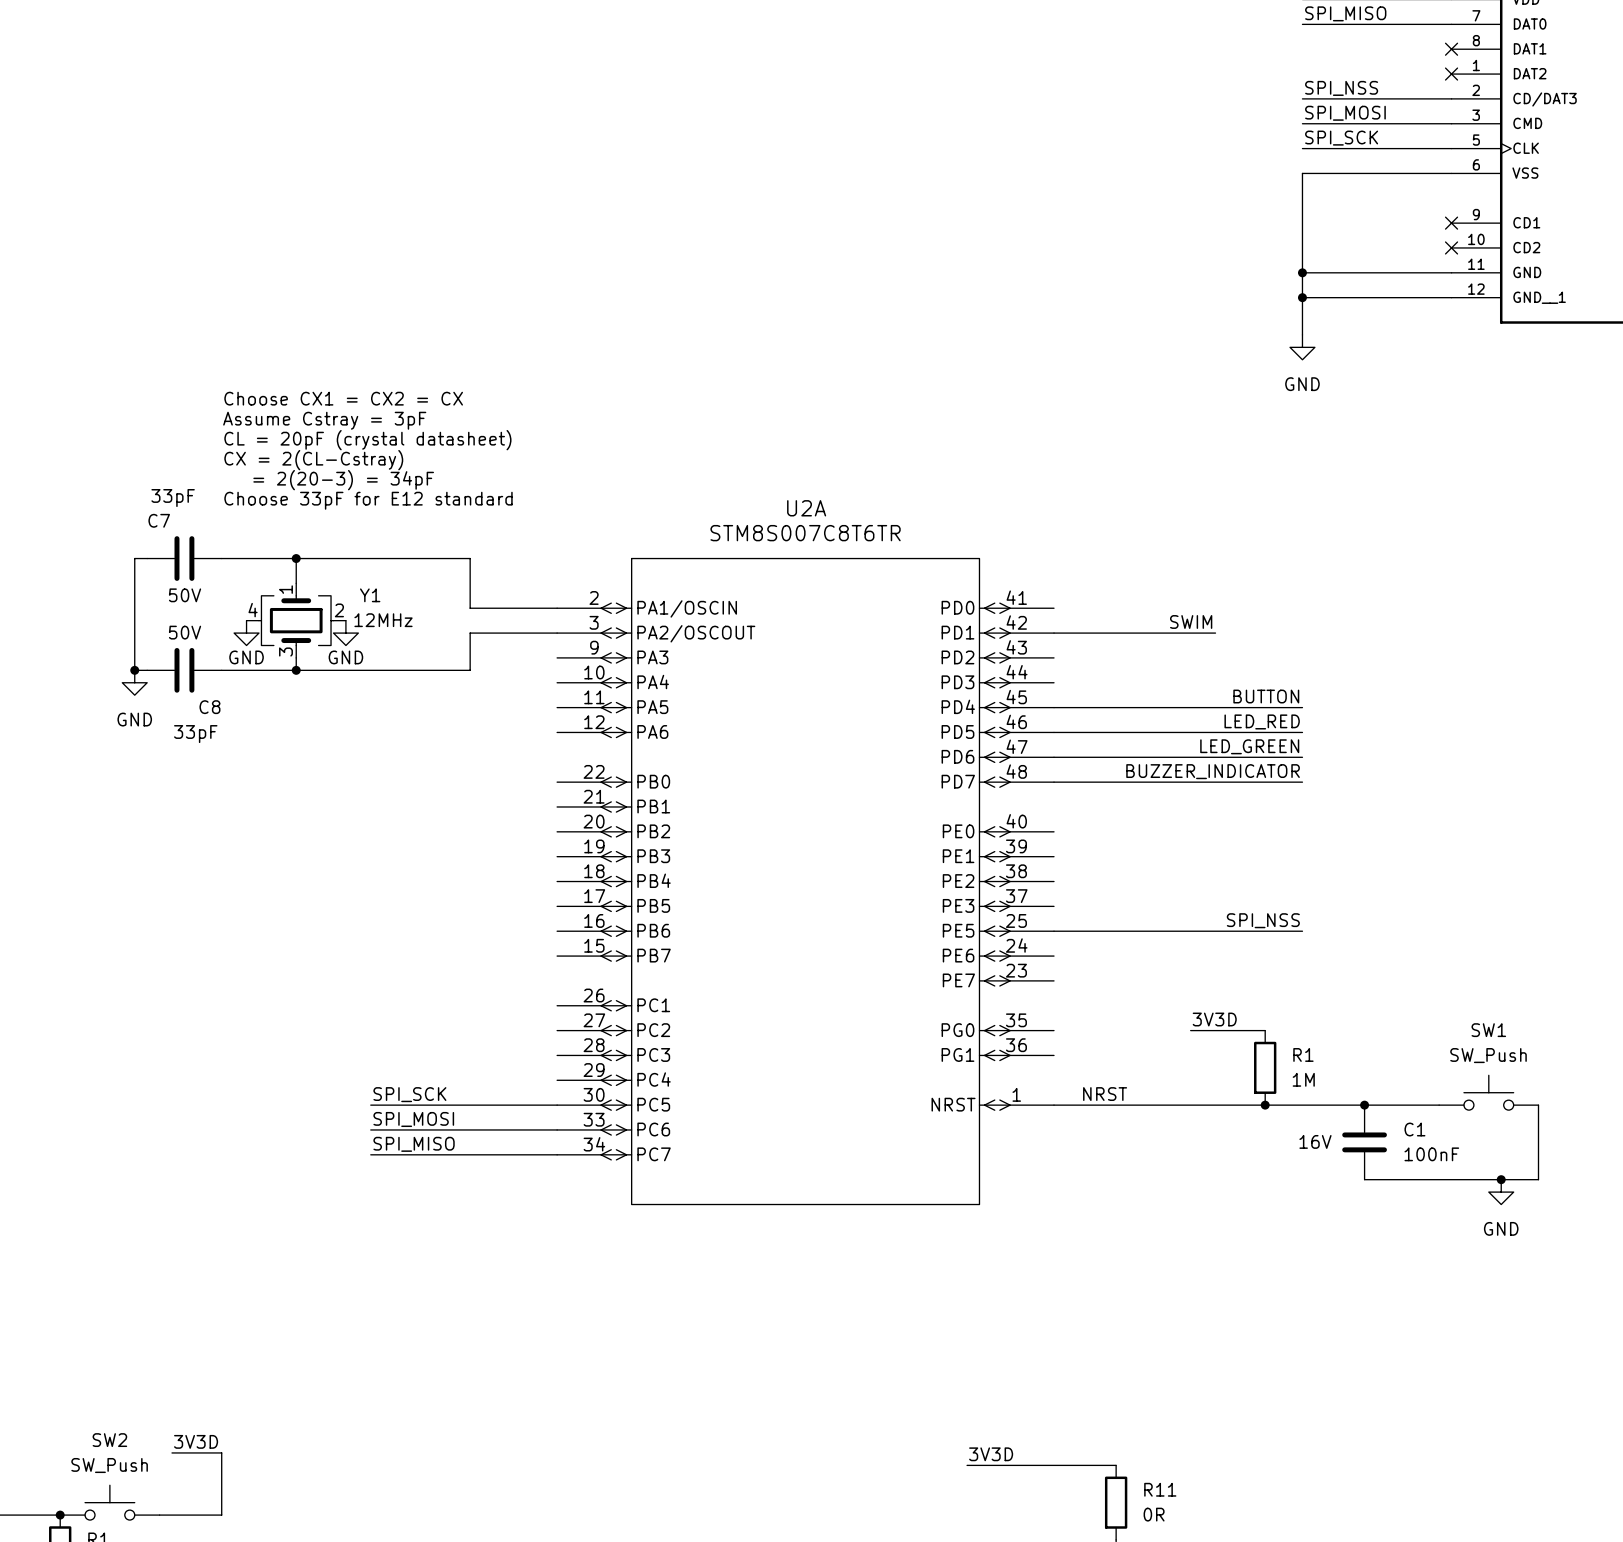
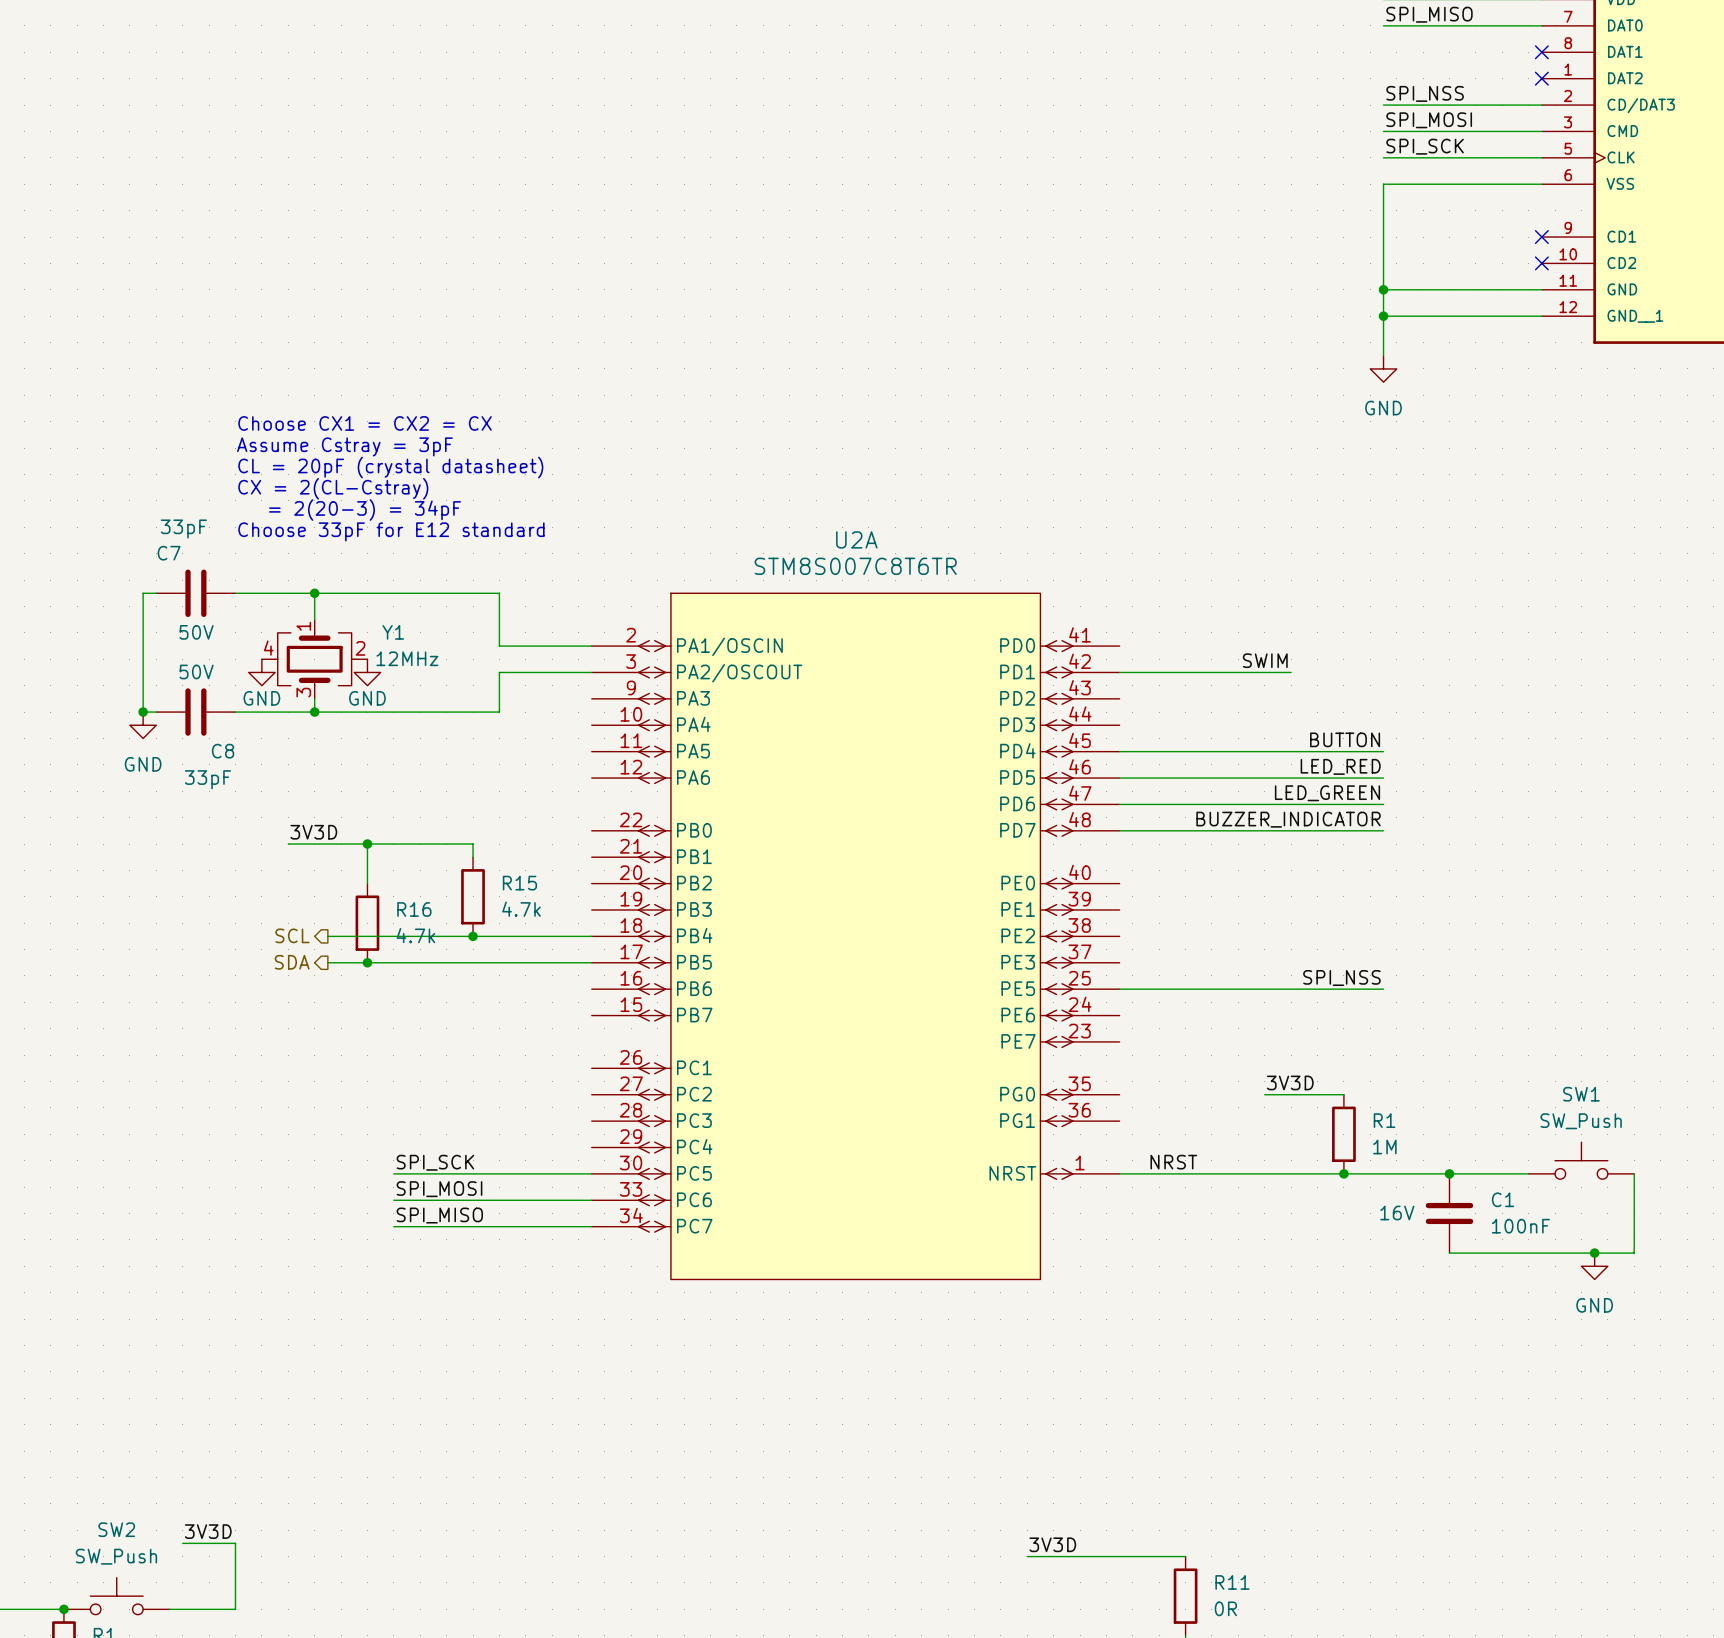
label: none -> 3V3D (313, 832)
wire: none -> (288, 844) (473, 844) (473, 857)
wire: none -> (367, 844) (367, 883)
junction: none -> (367, 844)
R15: none -> 4.7k (473, 896)
R16: none -> 4.7k (367, 923)
hierarchical label: none -> SCL (292, 935)
wire: none -> (327, 936) (591, 936)
junction: none -> (473, 936)
hierarchical label: none -> SDA (292, 962)
wire: none -> (327, 962) (591, 962)
junction: none -> (367, 962)

